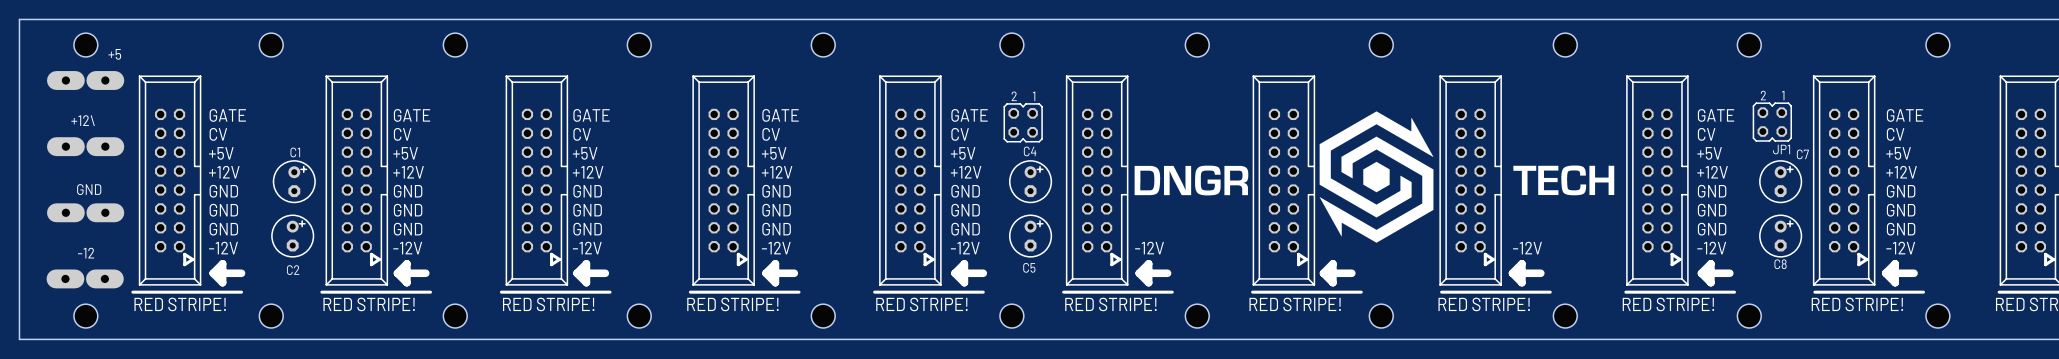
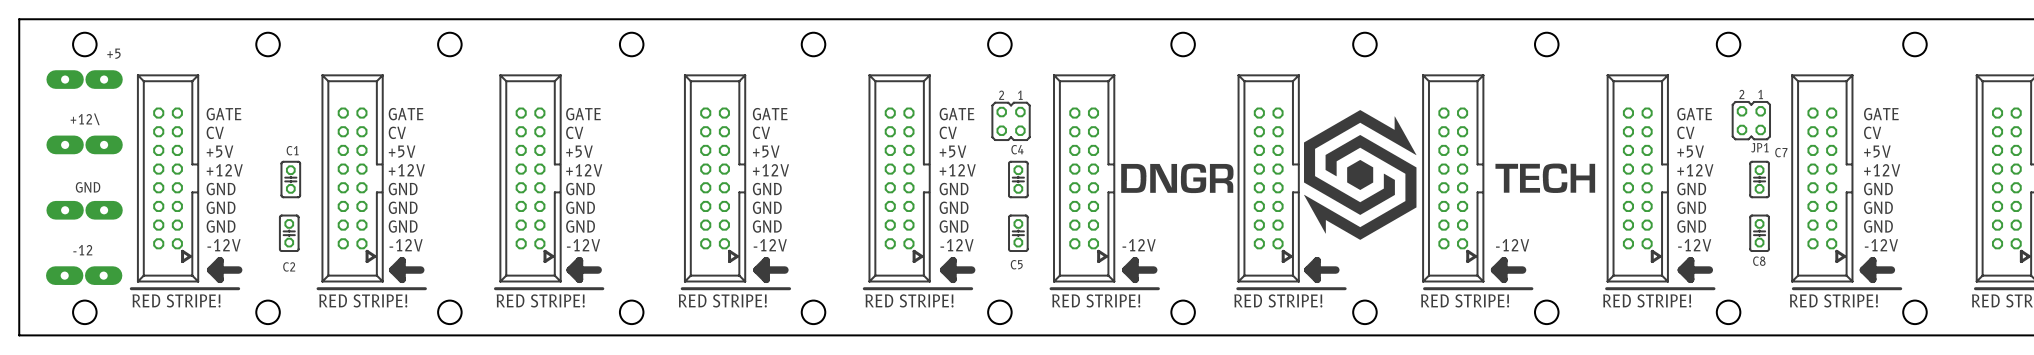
C1 footprint: [272, 160, 316, 204] -> [280, 161, 301, 198]
C4 footprint: [1009, 160, 1052, 204] -> [1008, 161, 1029, 198]
C7 footprint: [1759, 160, 1803, 204] -> [1749, 161, 1770, 198]
C2 footprint: [271, 214, 315, 258] -> [279, 214, 300, 252]
C5 footprint: [1009, 214, 1052, 258] -> [1008, 214, 1029, 252]
C8 footprint: [1759, 214, 1803, 258] -> [1749, 214, 1770, 252]

